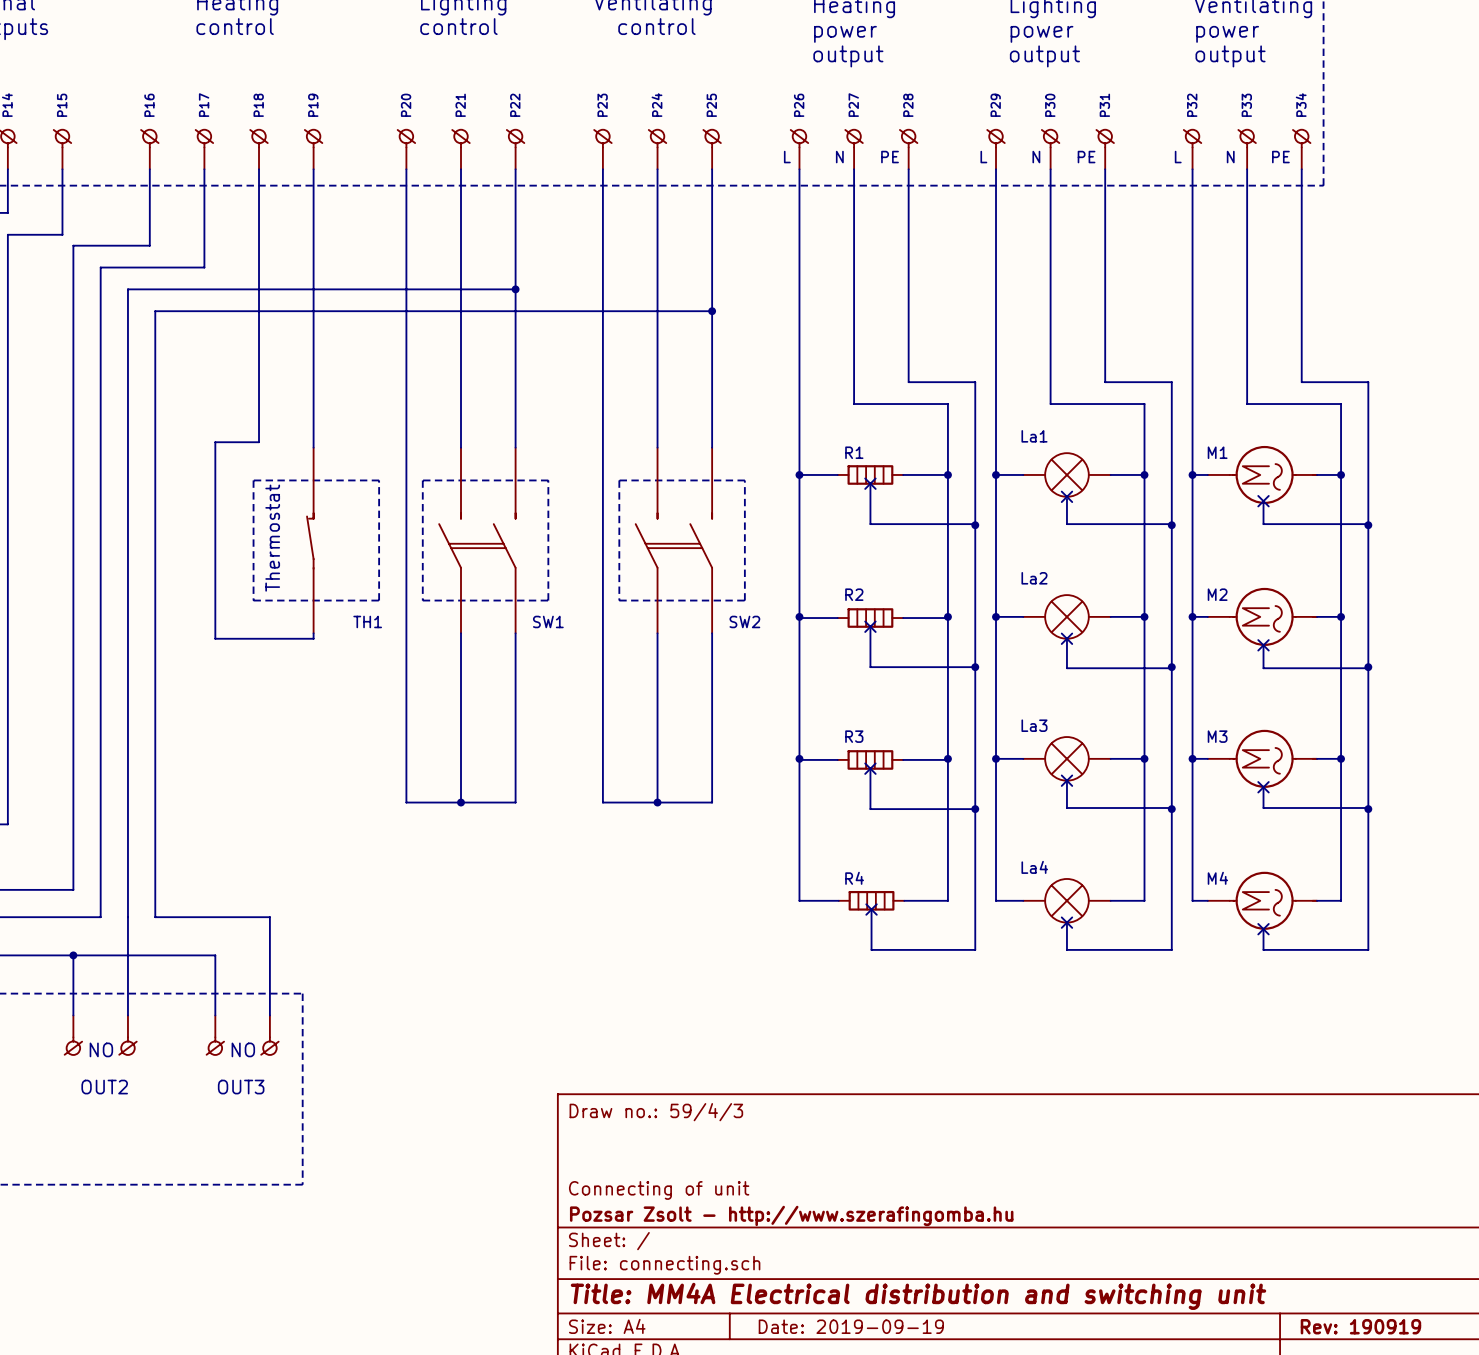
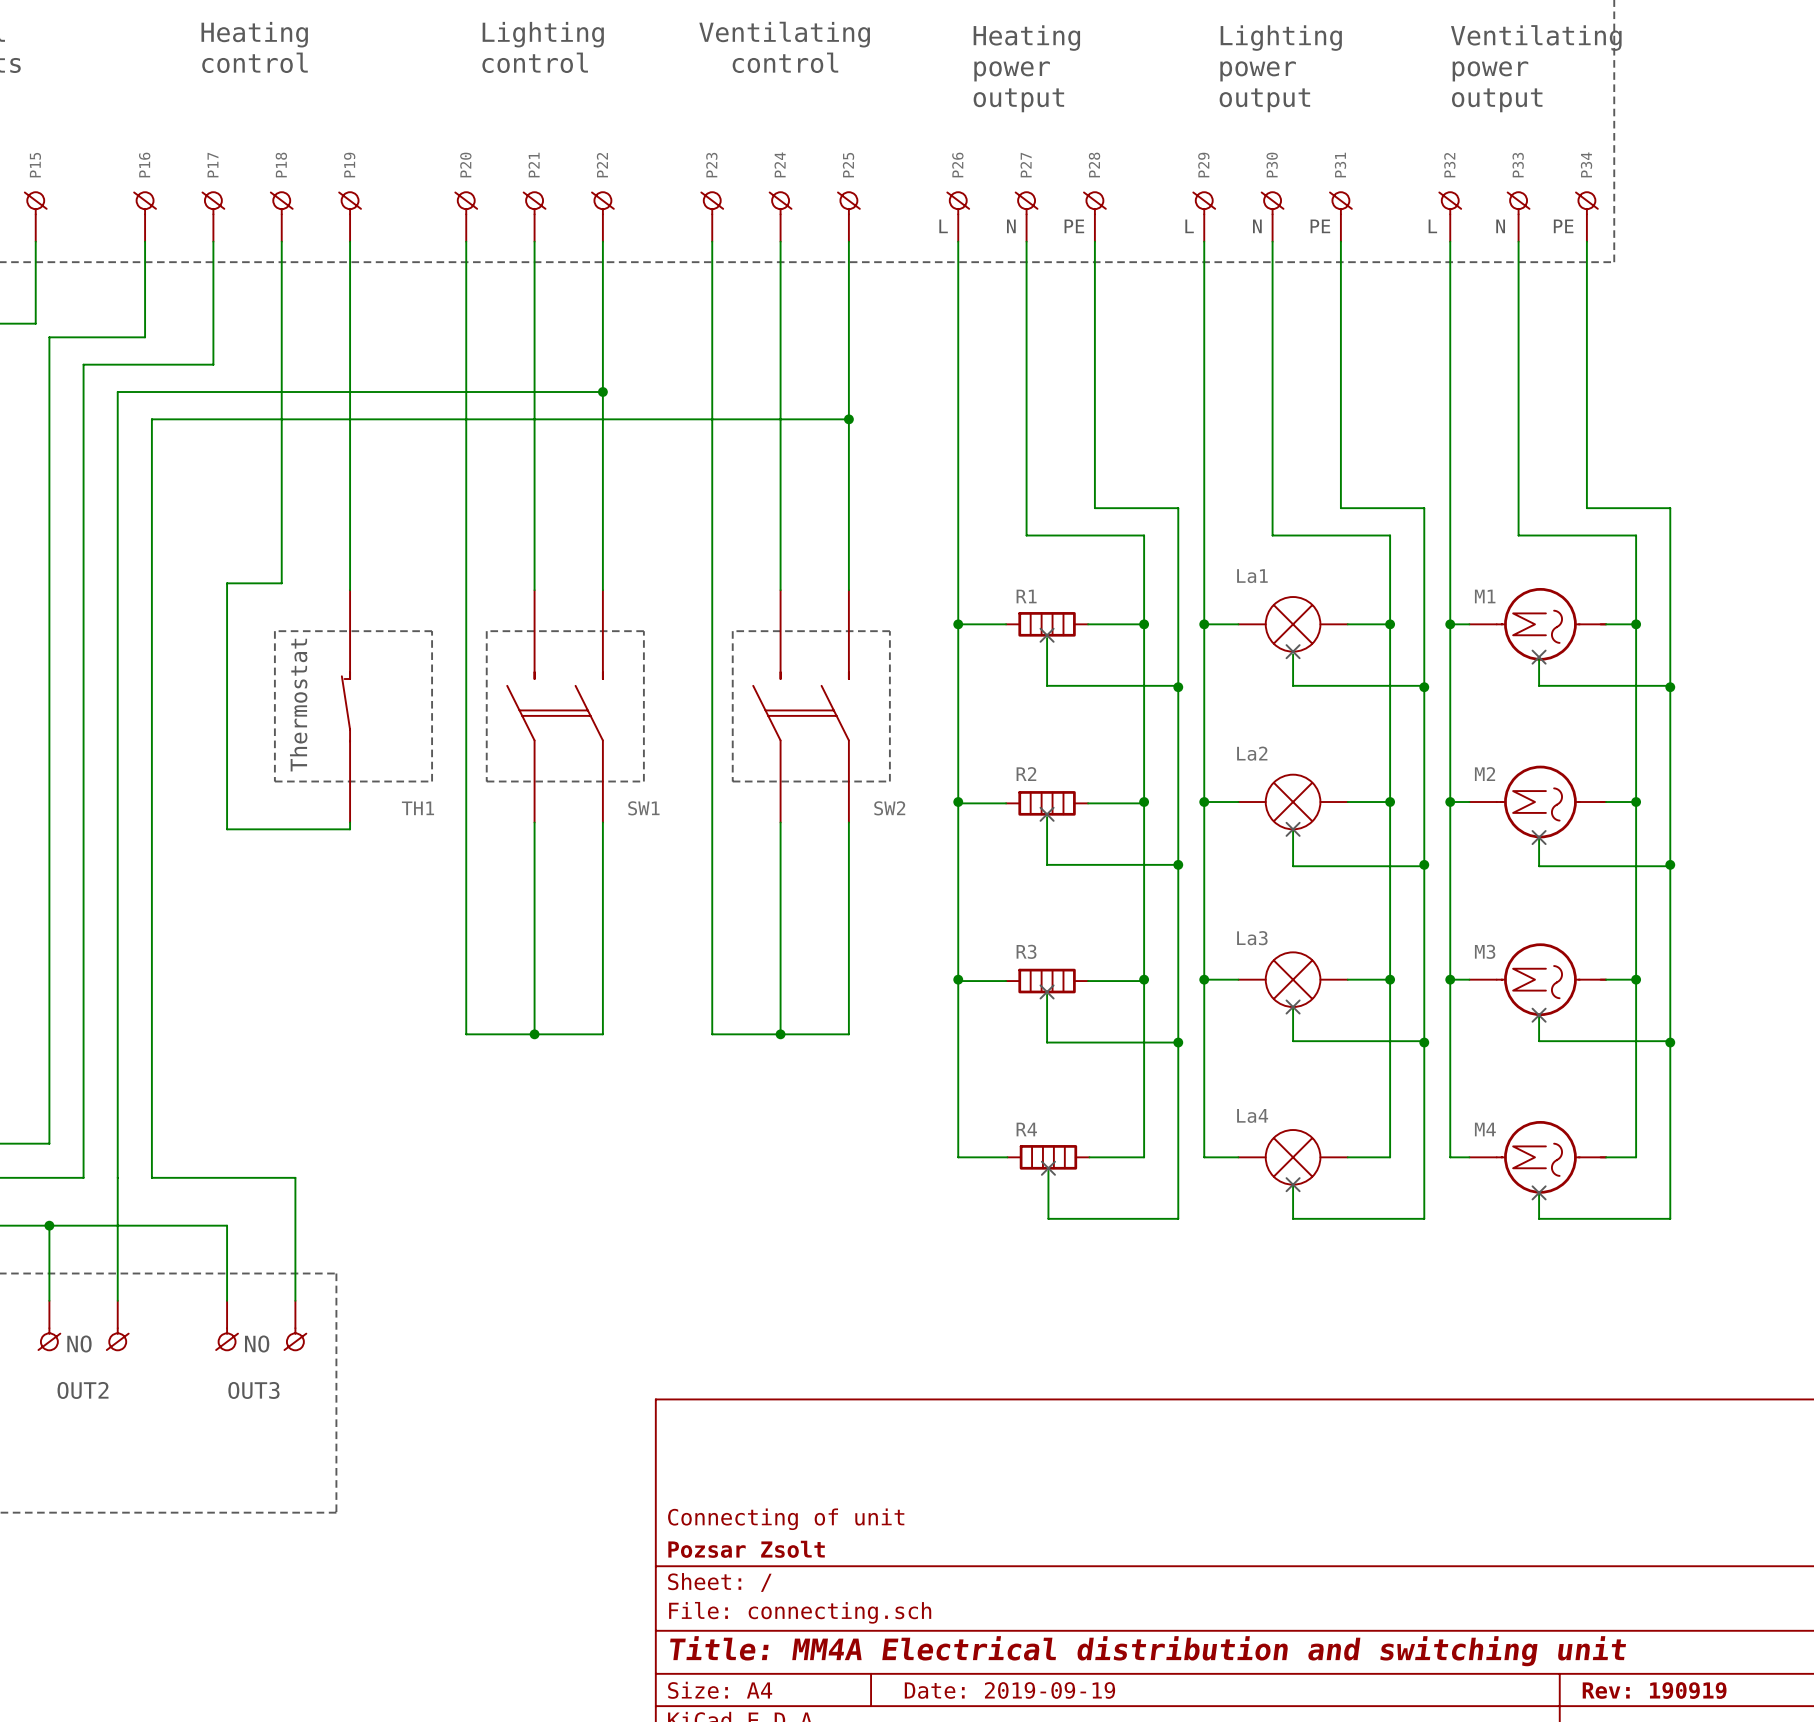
title block: Draw no.: 59/4/3 (656, 1112) -> none
title block: Pozsar Zsolt - http://www.szerafingomba.hu (791, 1215) -> Pozsar Zsolt (746, 1549)

